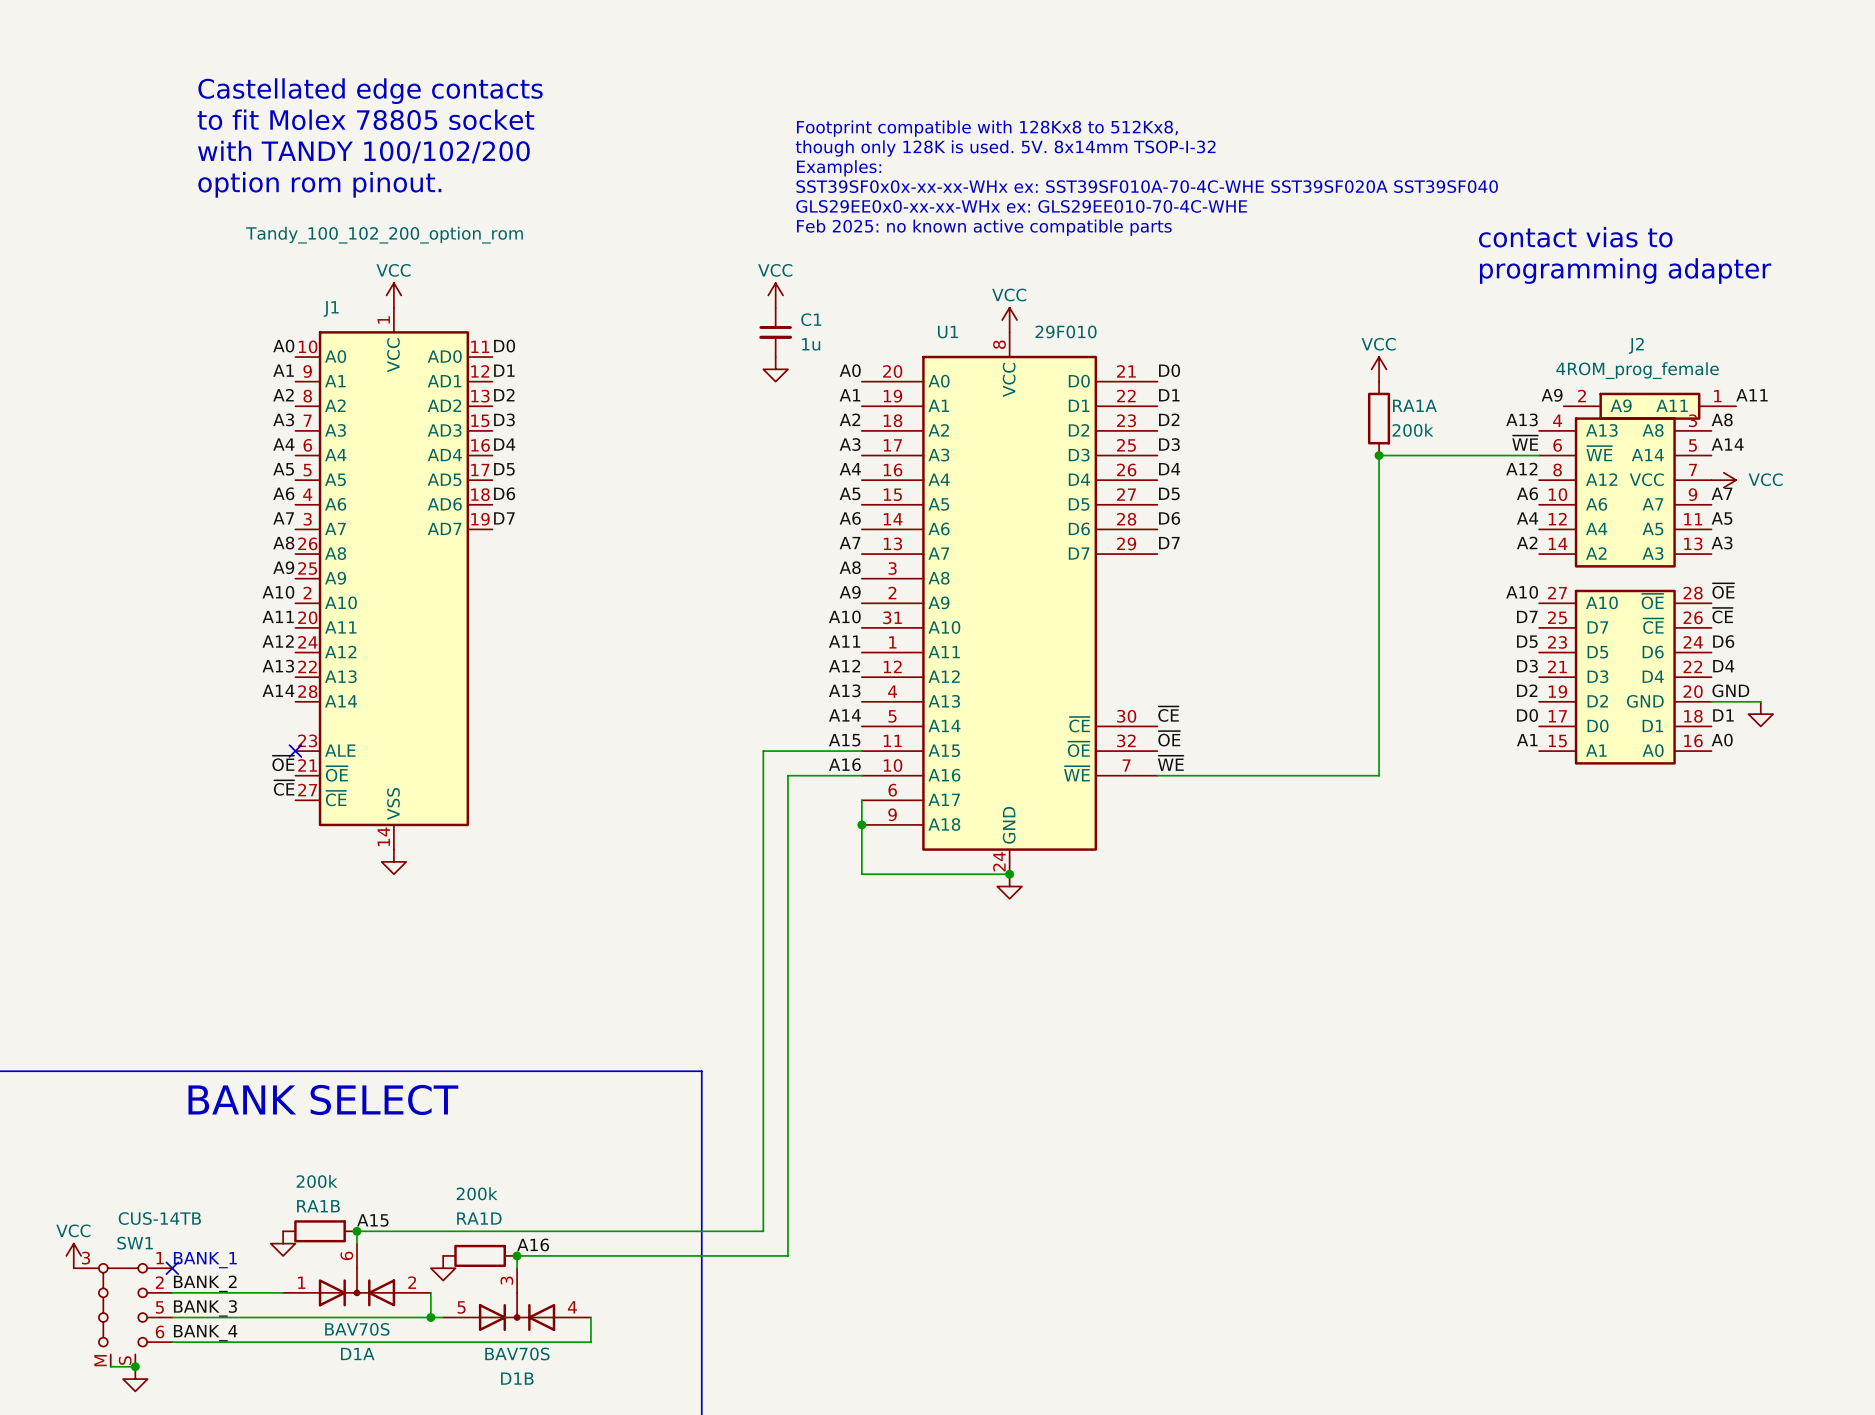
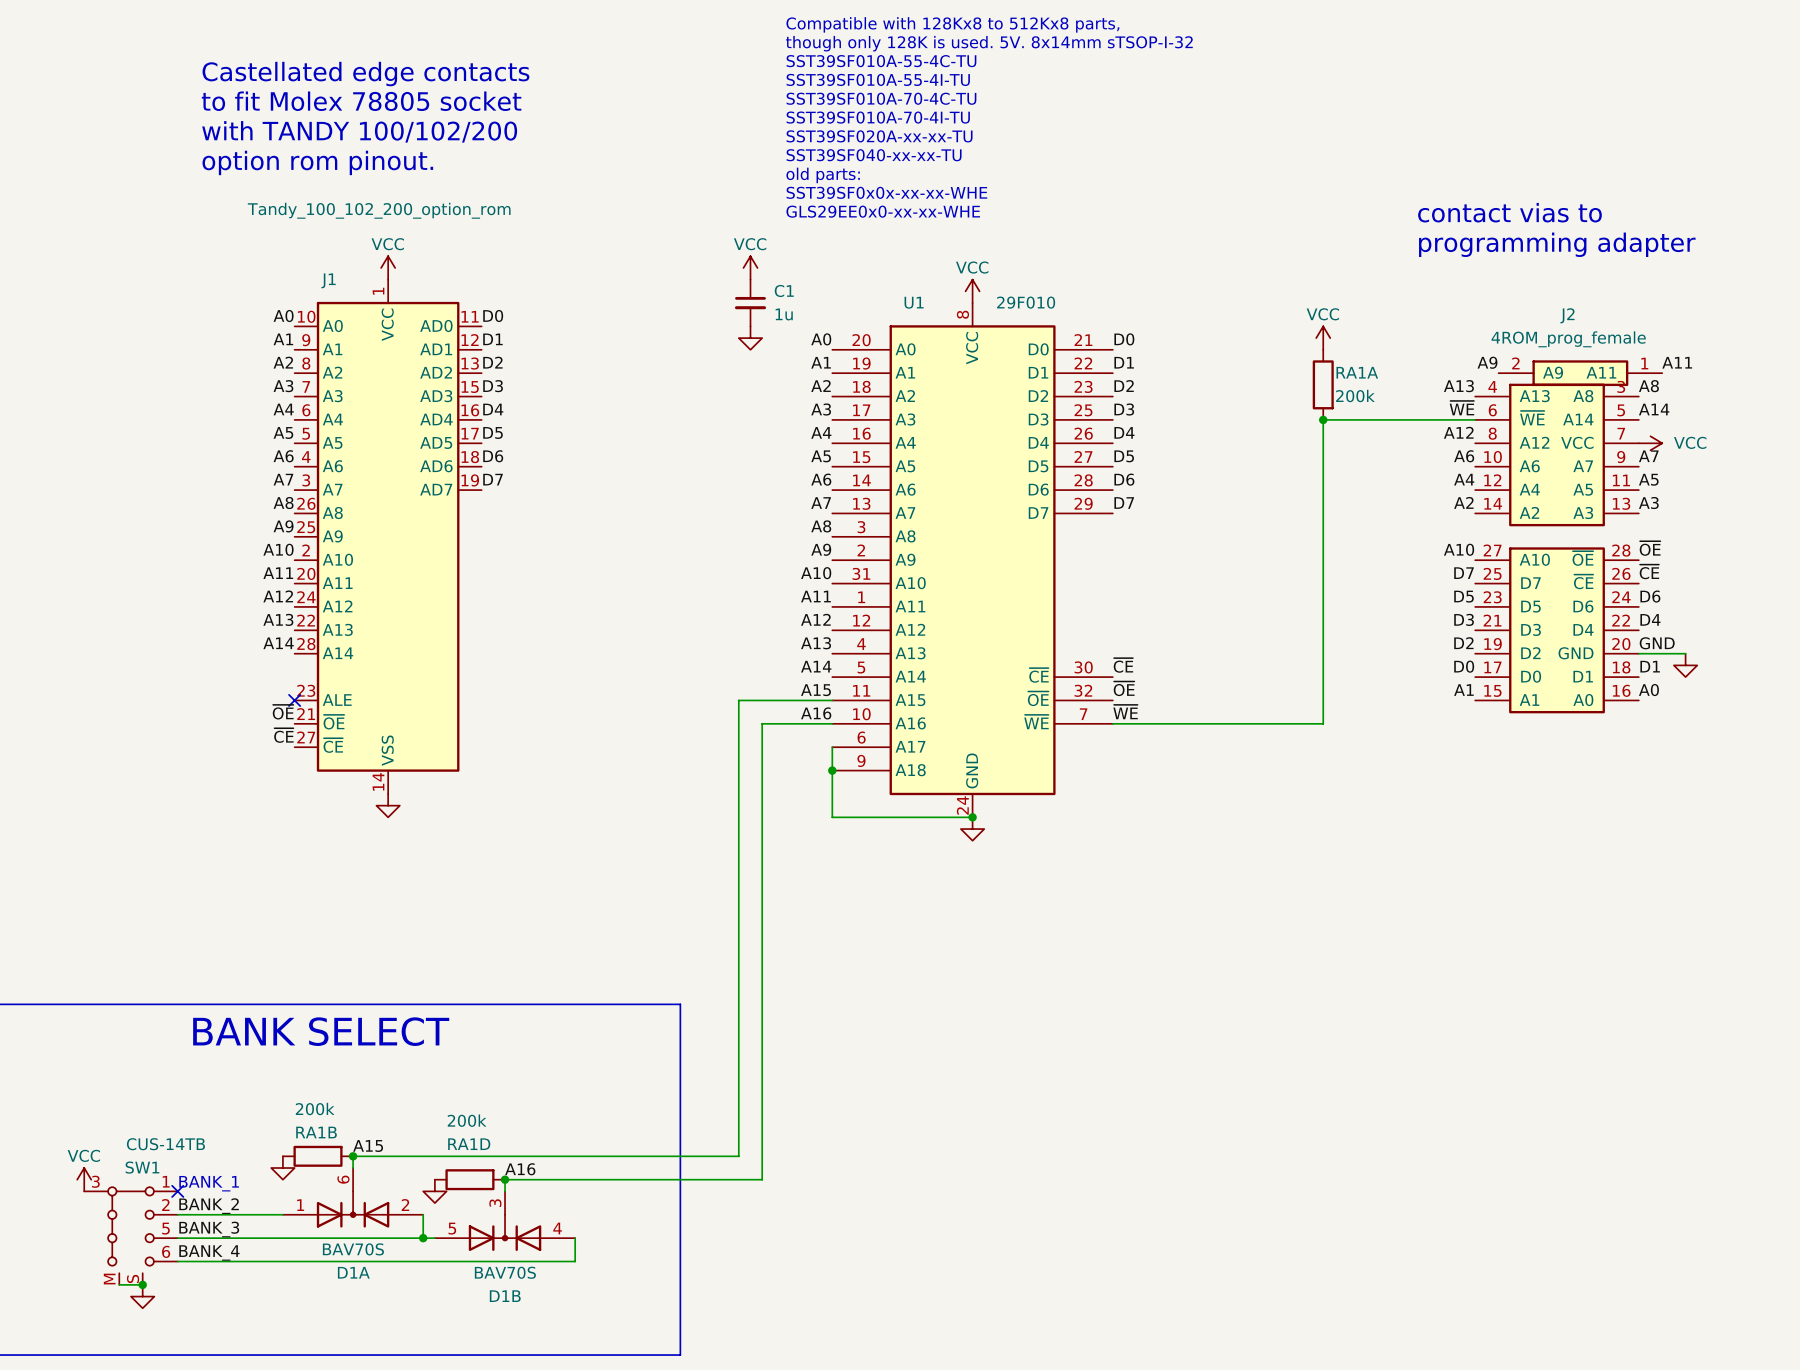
text: none -> Compatible with 128Kx8 to 512Kx8 parts, (952, 24)
text: none -> though only 128K is used. 5V. 8x14mm sTSOP-I-32 (989, 43)
text: none -> SST39SF010A-55-4C-TU (881, 61)
text: none -> SST39SF010A-55-4I-TU (878, 79)
text: none -> SST39SF010A-70-4C-TU (881, 98)
text: Footprint compatible with 128Kx8 to 512Kx8, (987, 128) -> none
text: none -> SST39SF010A-70-4I-TU (878, 117)
text: though only 128K is used. 5V. 8x14mm TSOP-I-32 (1005, 148) -> none
text: none -> SST39SF020A-xx-xx-TU (879, 136)
text: Examples: (839, 168) -> none
text: none -> SST39SF040-xx-xx-TU (874, 155)
text: SST39SF0x0x-xx-xx-WHx ex: SST39SF010A-70-4C-WHE SST39SF020A SST39SF040 (1147, 186) -> none
text: none -> old parts: (823, 175)
text: GLS29EE0x0-xx-xx-WHx ex: GLS29EE010-70-4C-WHE (1021, 206) -> none
text: none -> SST39SF0x0x-xx-xx-WHE (886, 192)
text: Feb 2025: no known active compatible parts (984, 227) -> none
text: none -> GLS29EE0x0-xx-xx-WHE (883, 211)

